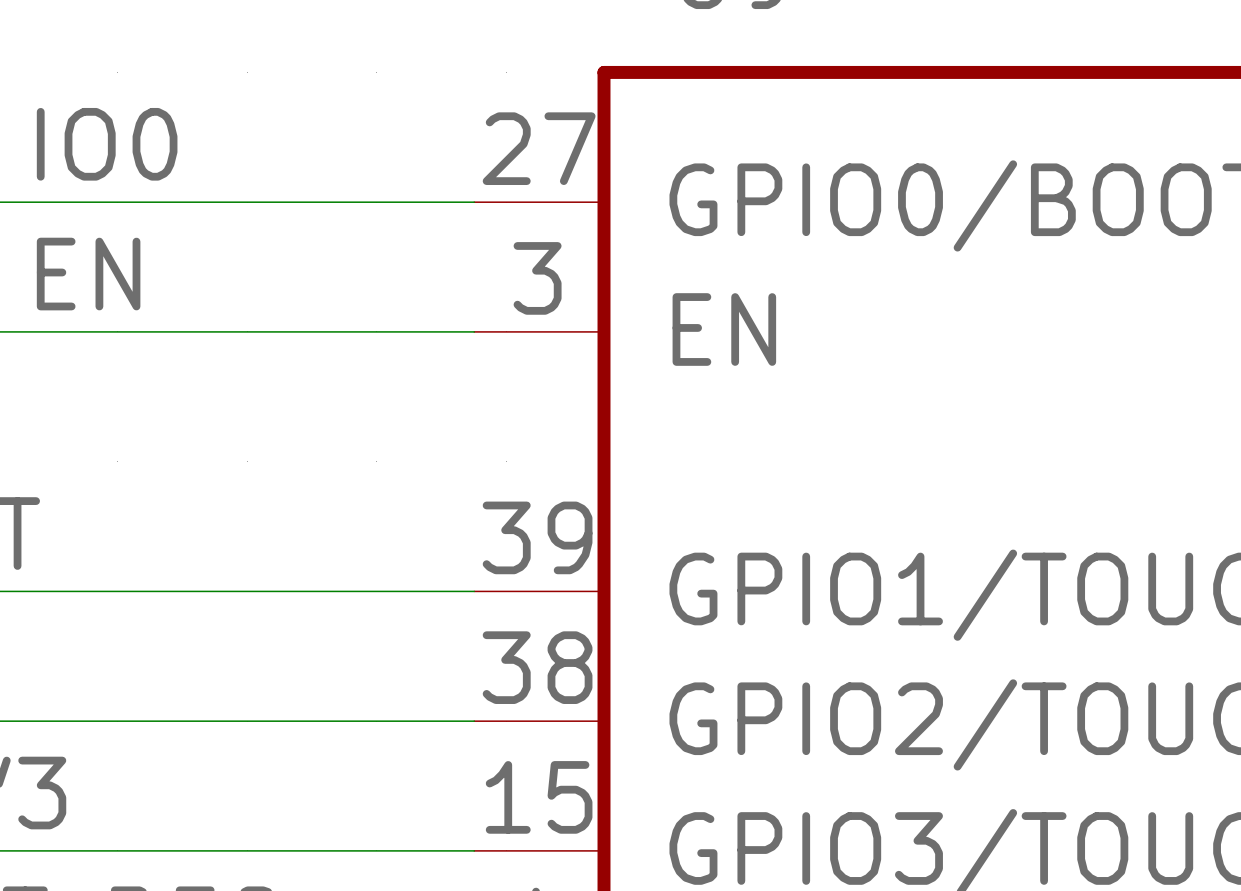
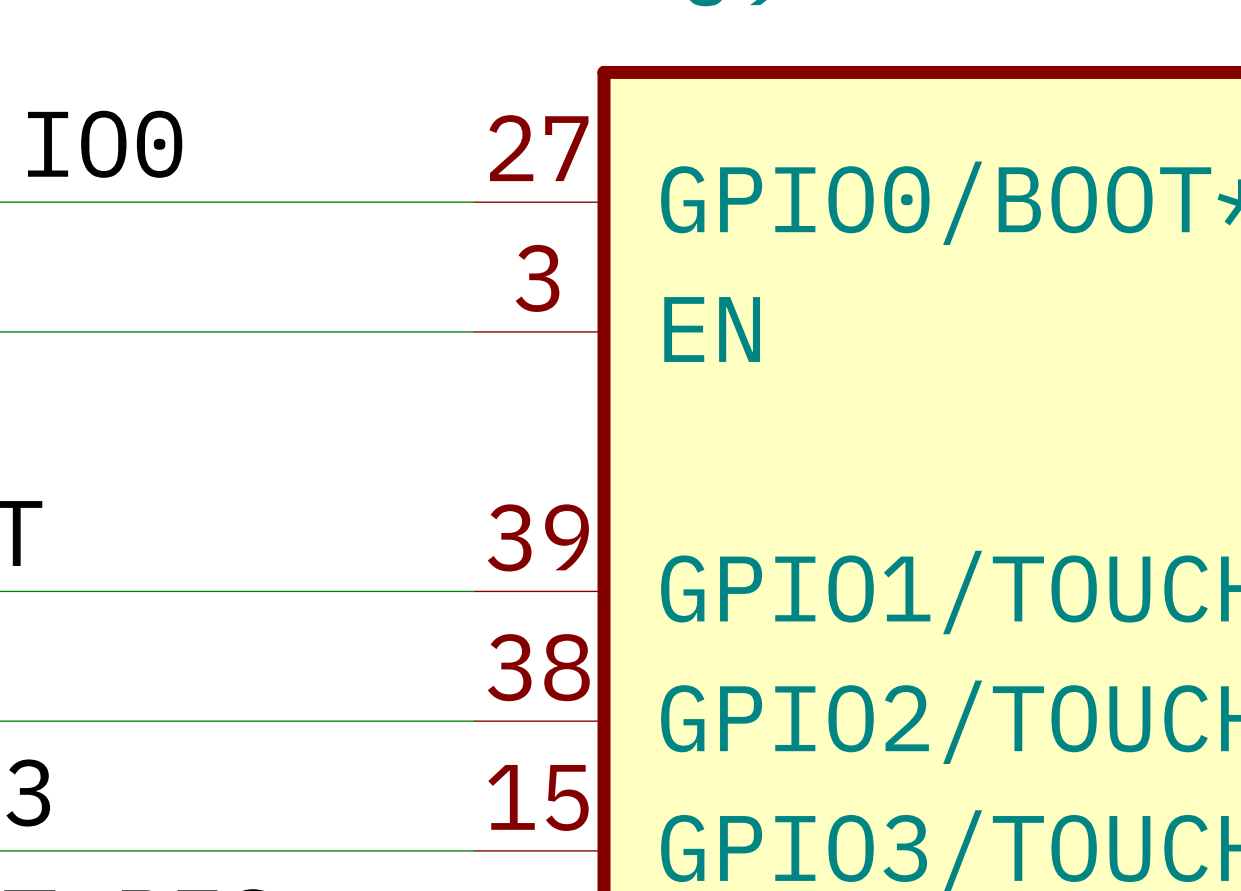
label: EN (88, 274) -> none

